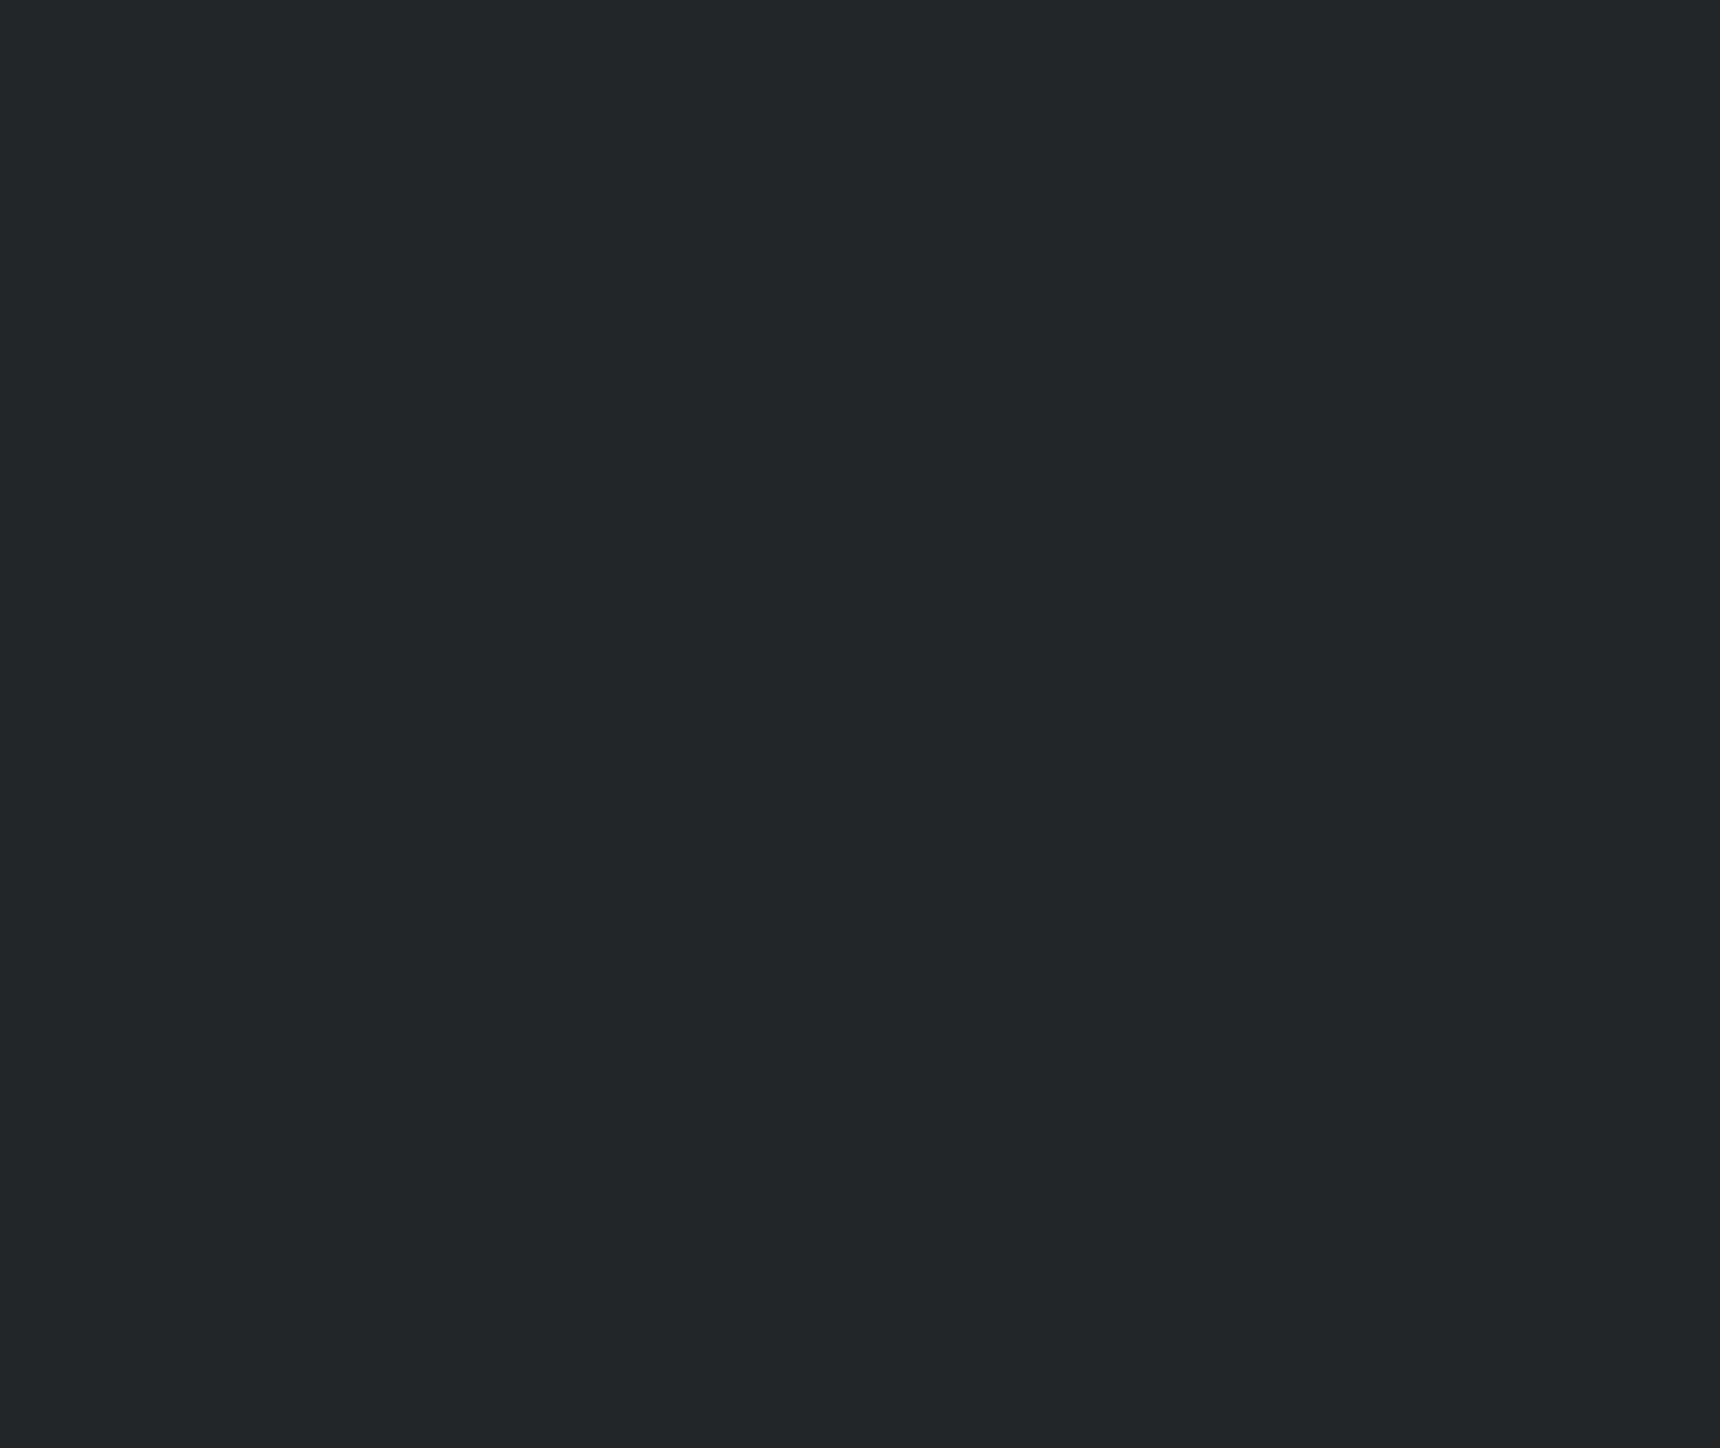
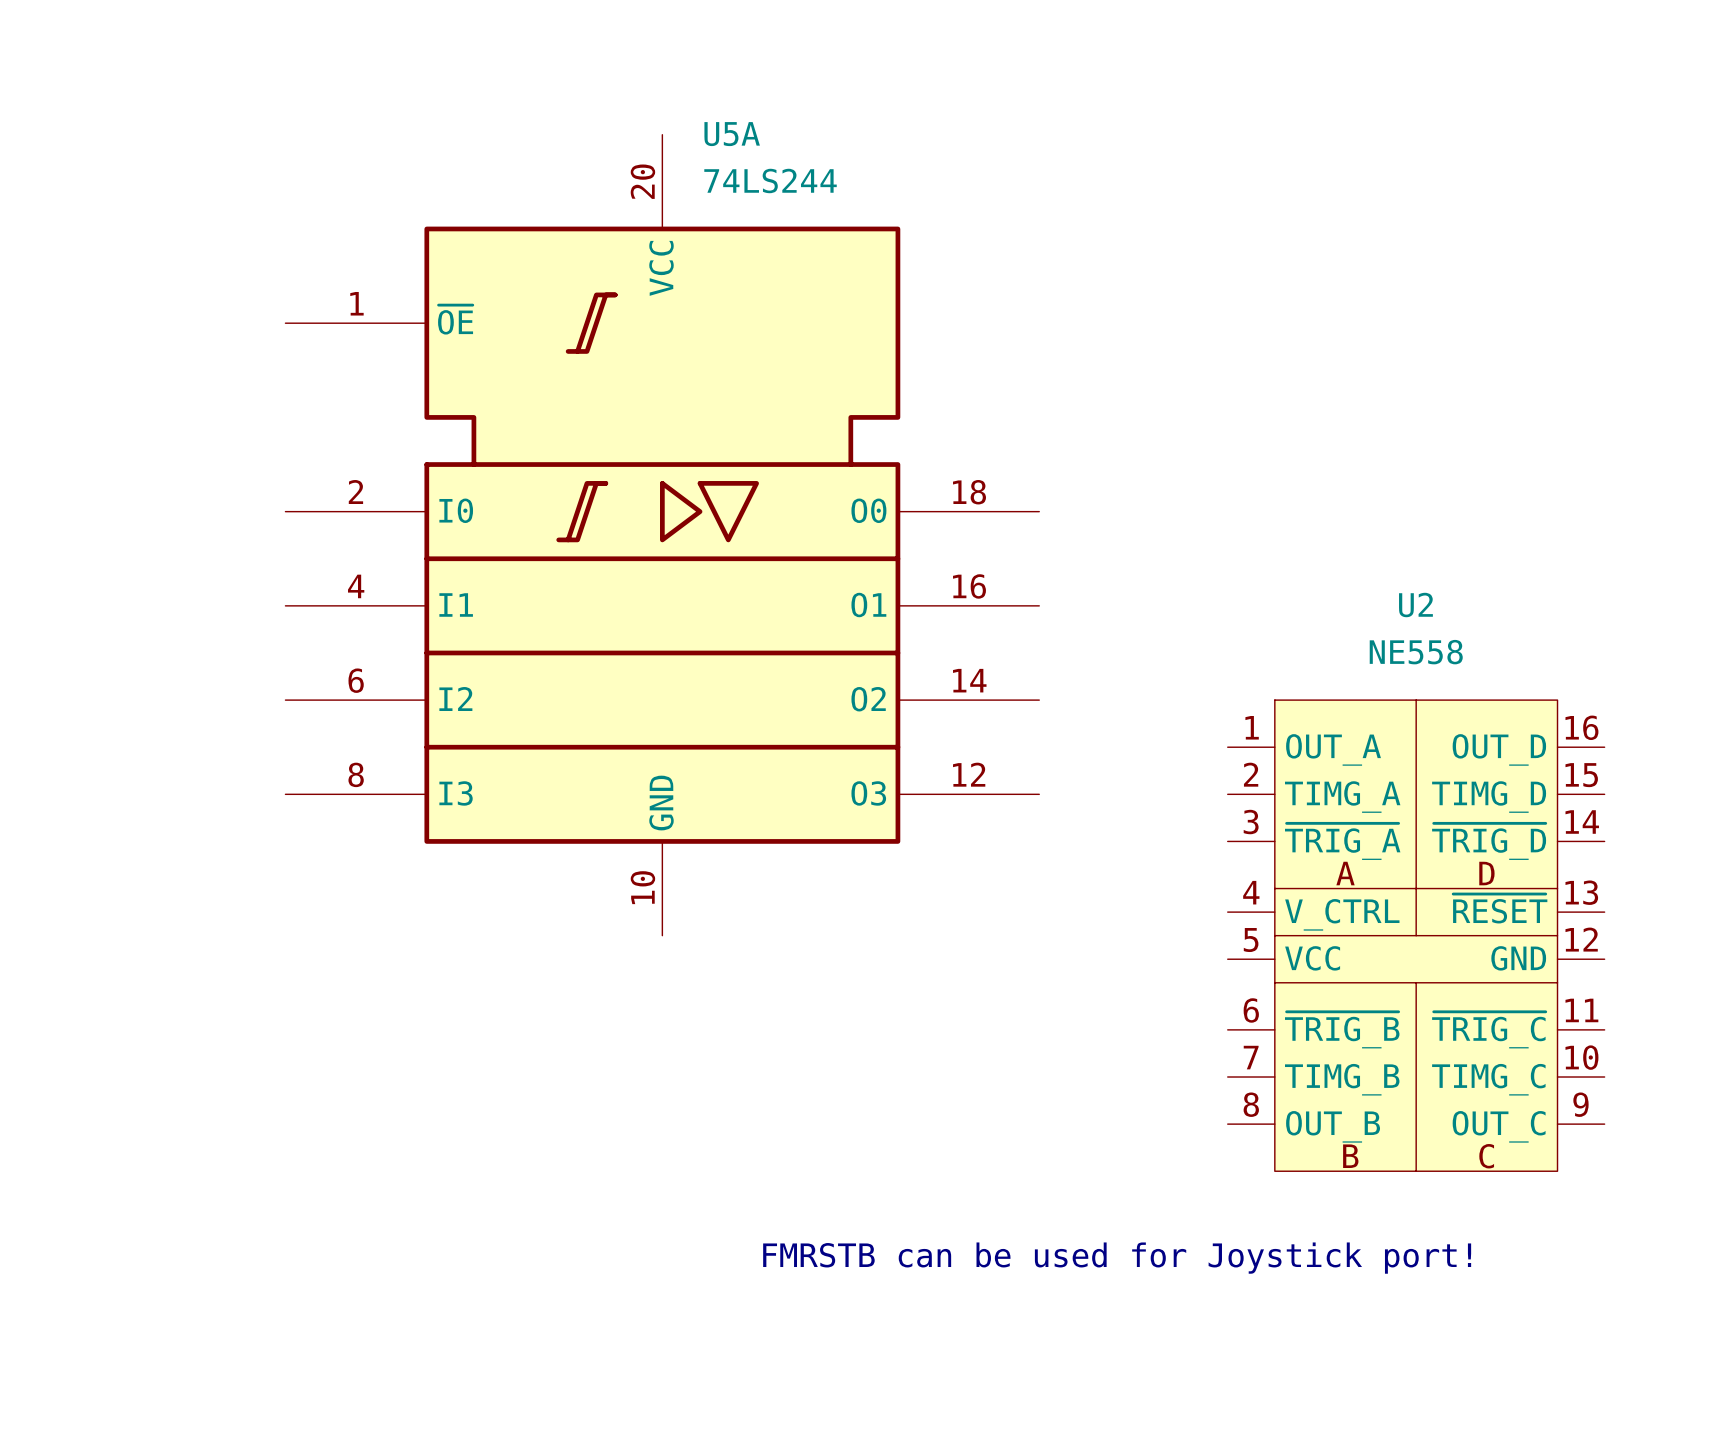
U5A: none -> 74LS244 (662, 535)
U2: none -> NE558 (1416, 935)
text: none -> FMRSTB can be used for Joystick port! (1117, 1258)

